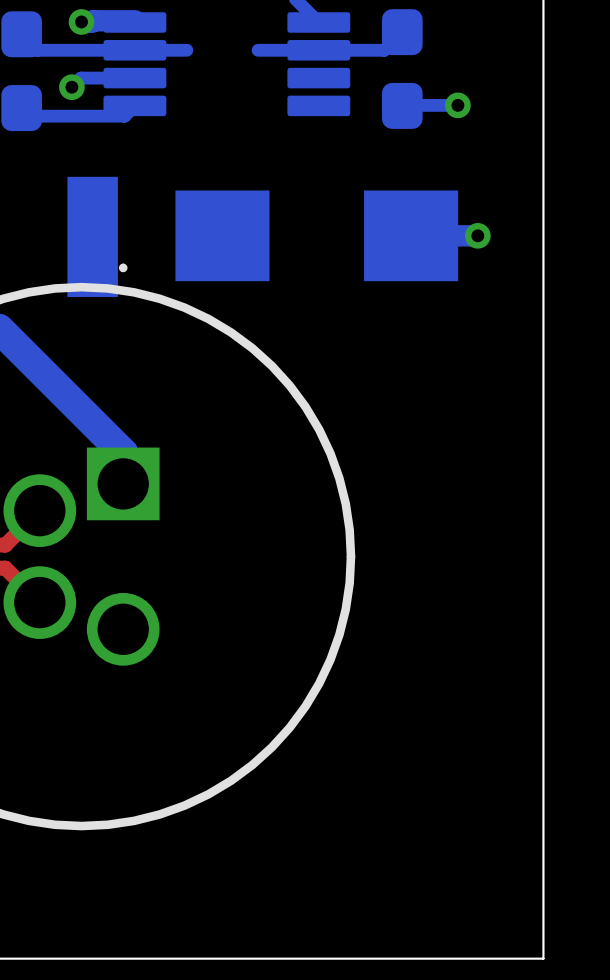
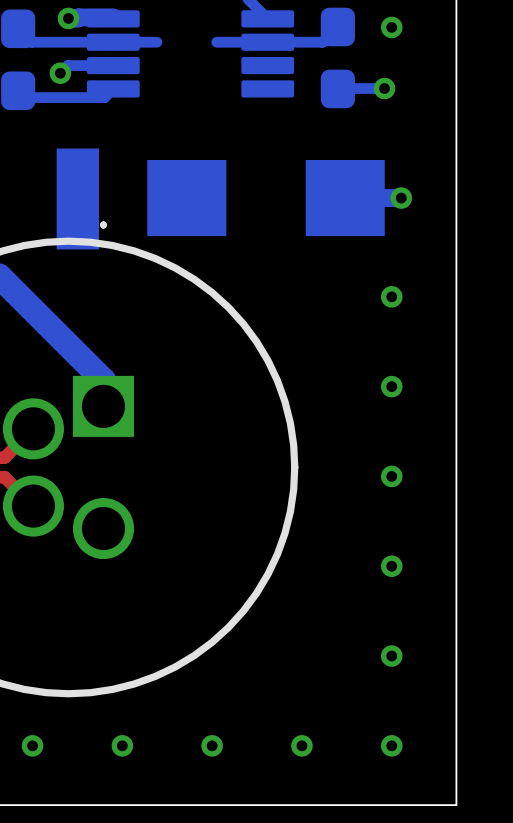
via: none -> (391, 27)
via: none -> (391, 296)
via: none -> (391, 386)
via: none -> (391, 476)
via: none -> (391, 566)
via: none -> (391, 656)
via: none -> (32, 745)
via: none -> (122, 745)
via: none -> (212, 745)
via: none -> (301, 745)
via: none -> (391, 745)

